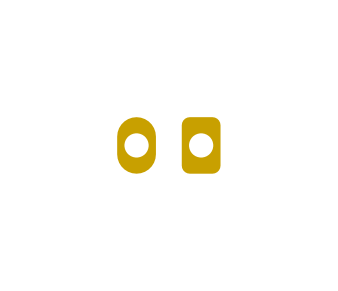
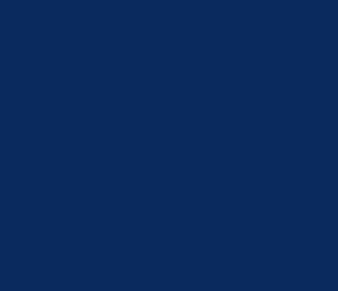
part: (168, 145) -> none

